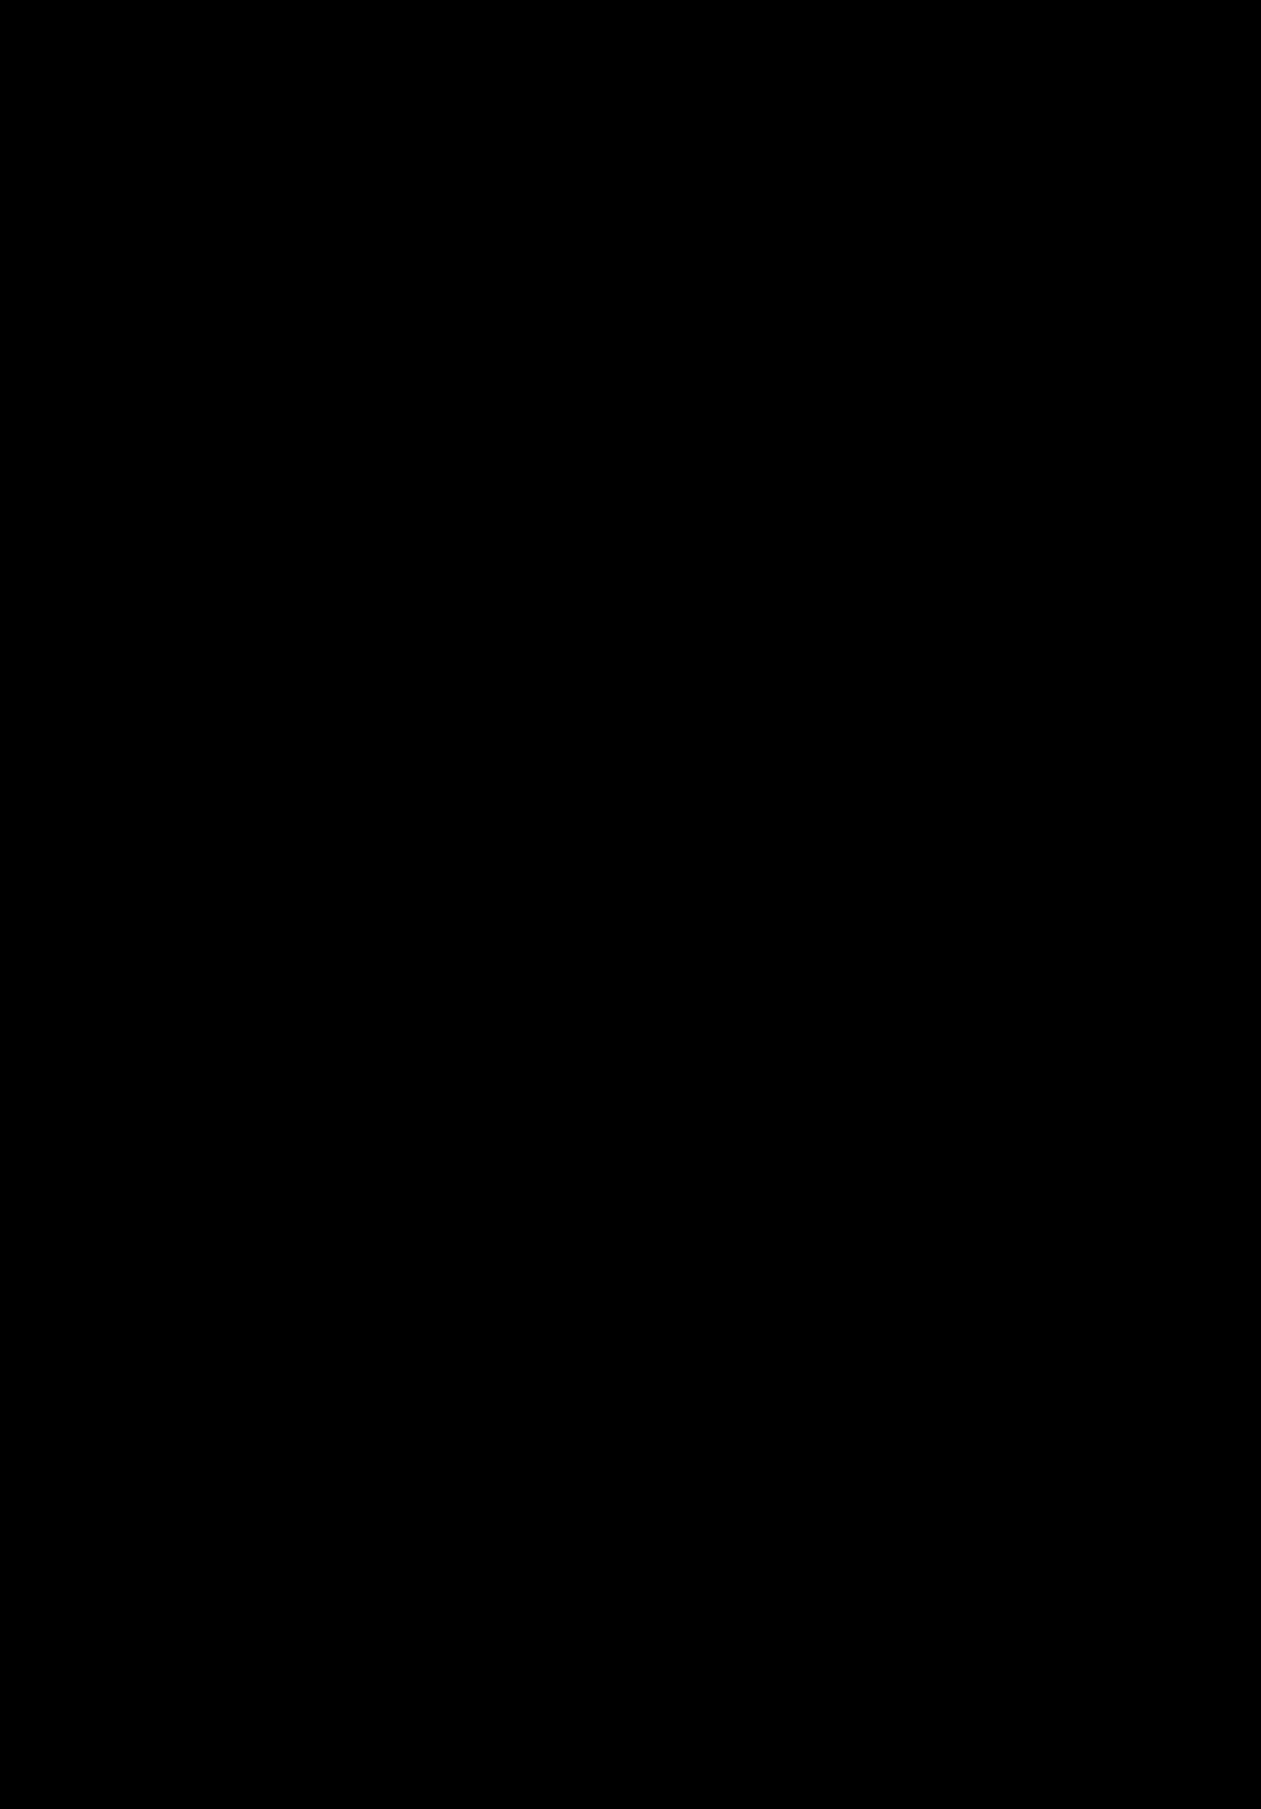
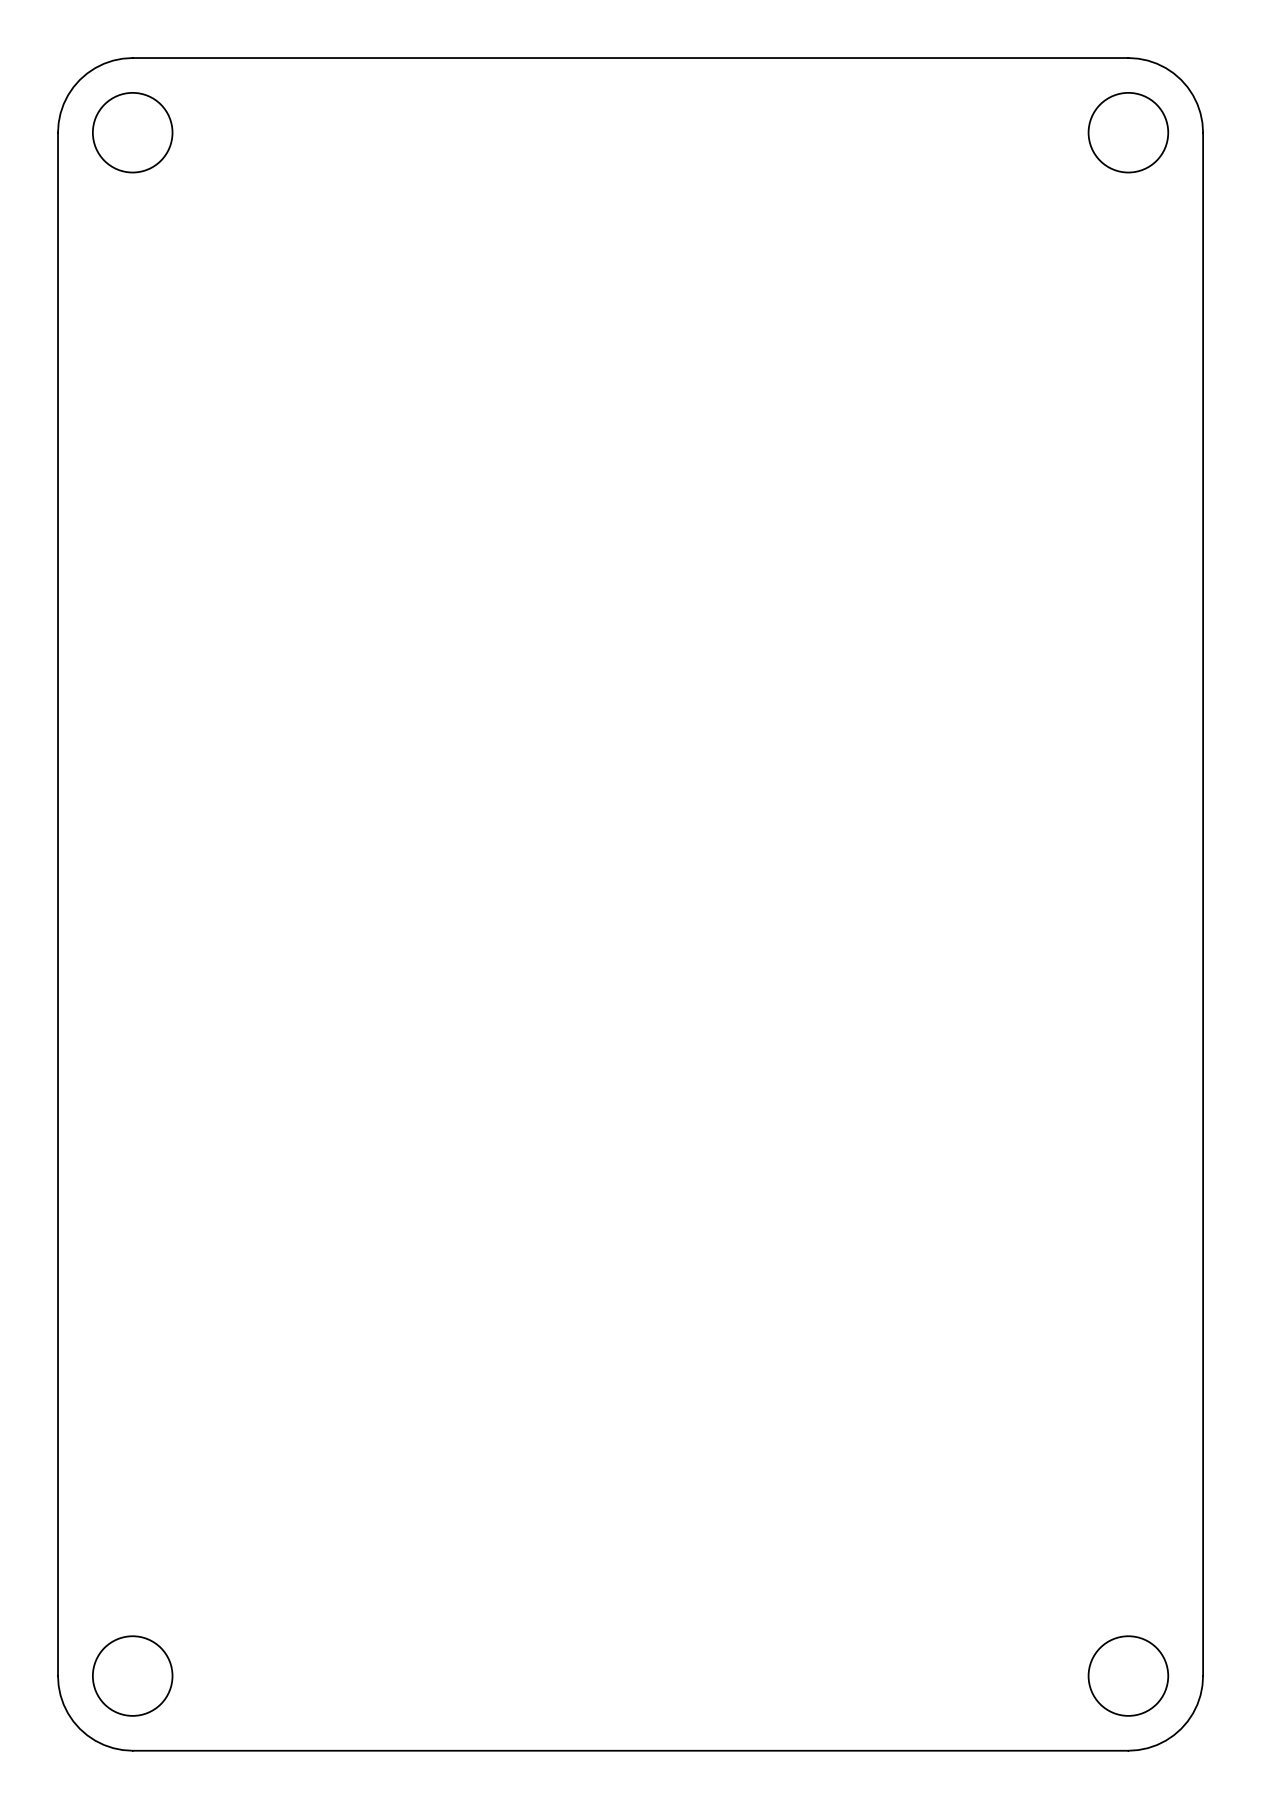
board edge: none -> (1128, 58) (132, 58) (113, 60) (95, 68) (79, 79) (68, 95) (60, 113) (58, 132) (58, 1676) (60, 1695) (68, 1713) (79, 1728) (95, 1740) (113, 1748) (132, 1750) (1128, 1750) (1147, 1748) (1165, 1740) (1181, 1728) (1193, 1713) (1200, 1695) (1203, 1676) (1203, 132) (1197, 104) (1181, 79) (1157, 63) (1128, 58)
round board edge: none -> [92, 92, 174, 174]
round board edge: none -> [1087, 92, 1169, 174]
round board edge: none -> [92, 1635, 174, 1717]
round board edge: none -> [1087, 1635, 1169, 1717]

